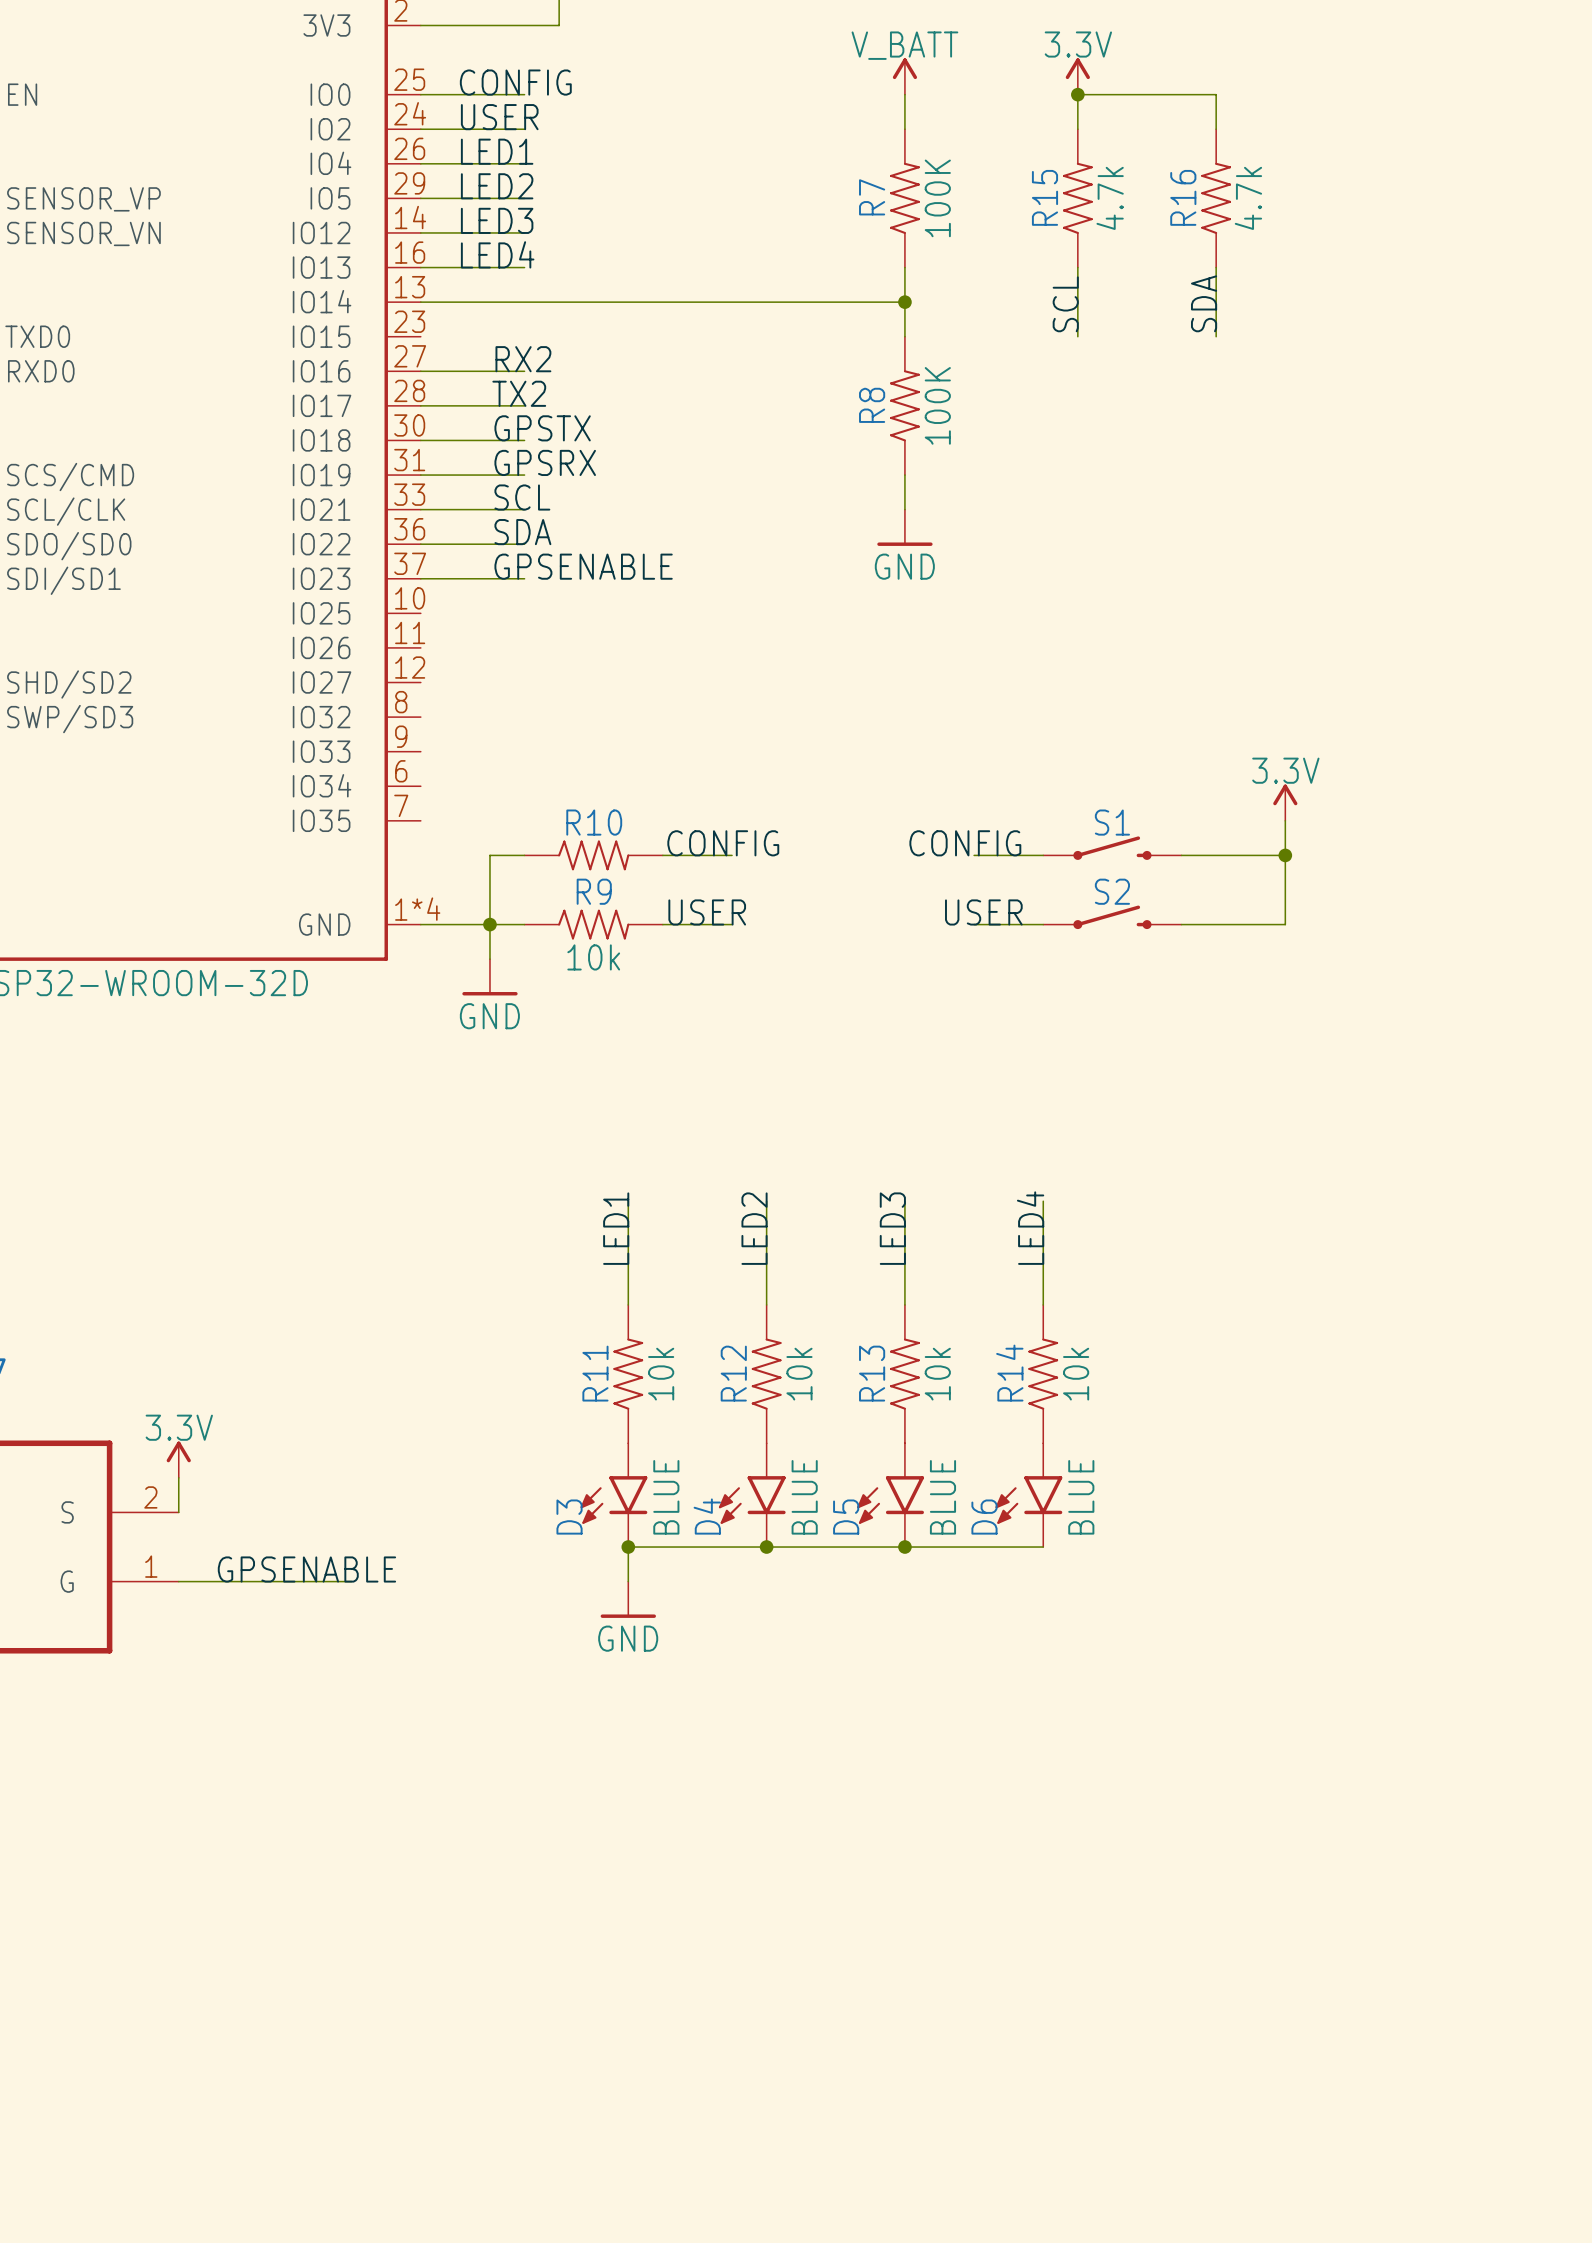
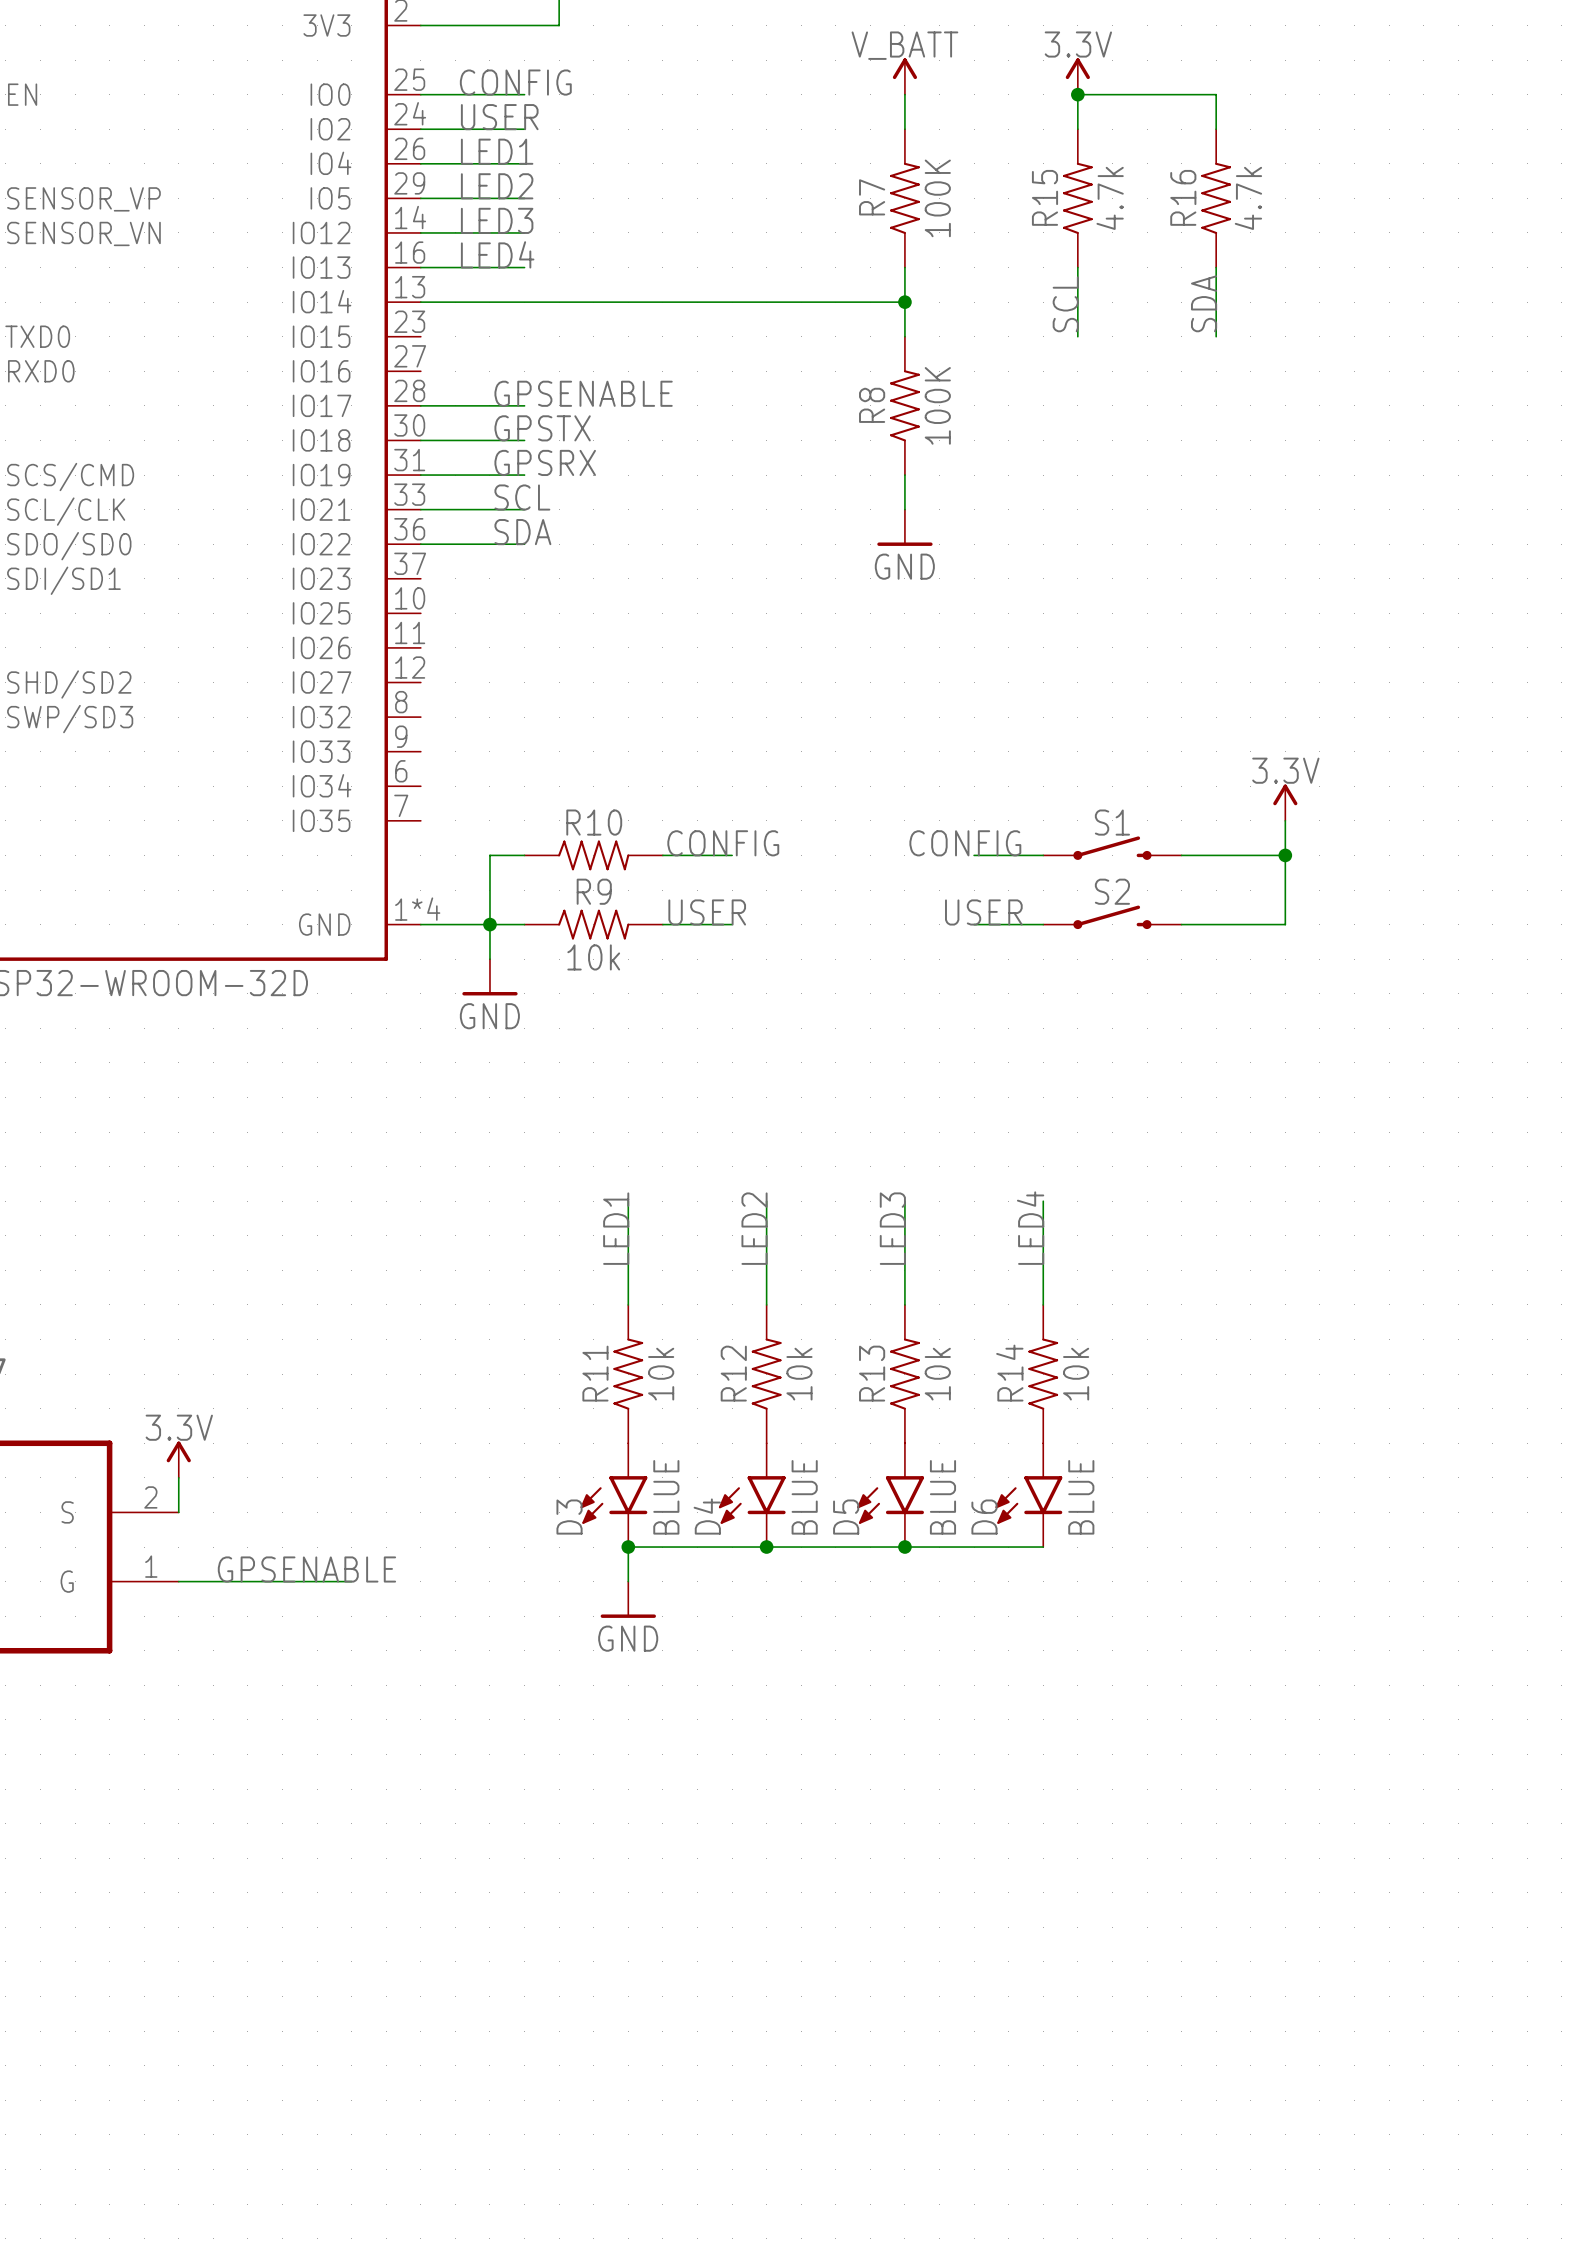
label: RX2 (523, 359) -> none
wire: (420, 371) (524, 371) -> none
label: TX2 (519, 393) -> GPSENABLE (583, 393)
label: GPSENABLE (583, 566) -> none
wire: (420, 578) (524, 578) -> none

